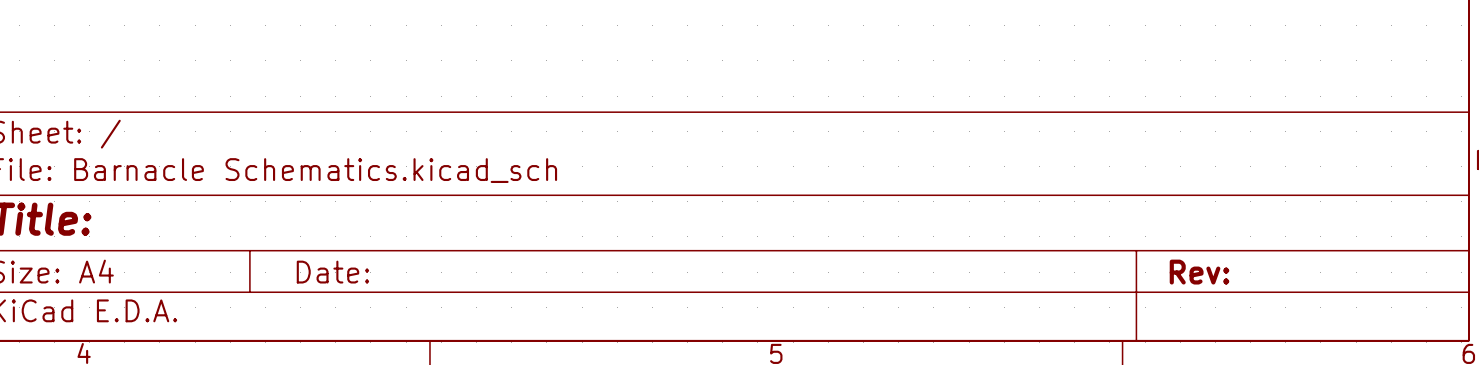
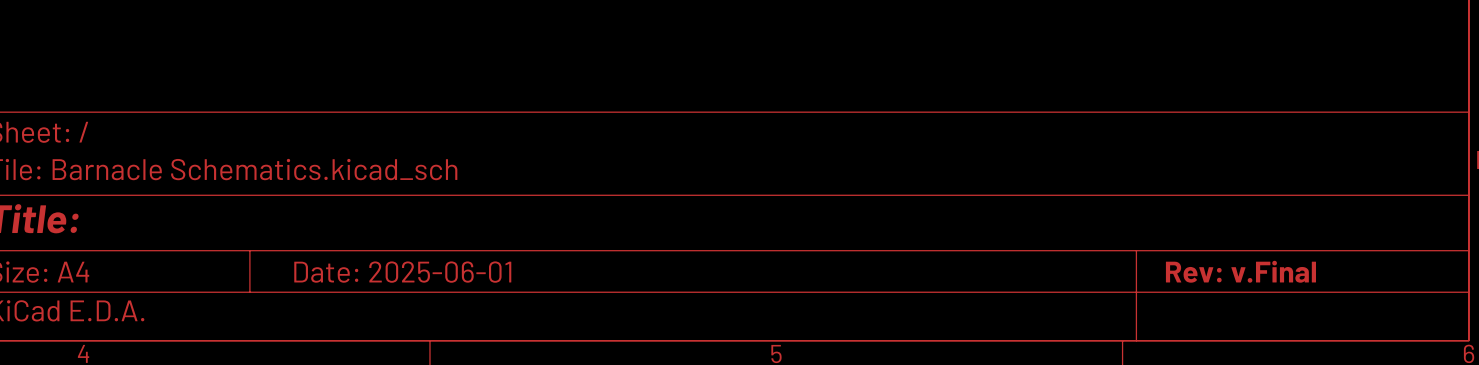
title block: Date: (332, 272) -> Date: 2025-06-01 (402, 272)
title block: Rev: (1199, 272) -> Rev: v.Final (1240, 271)

